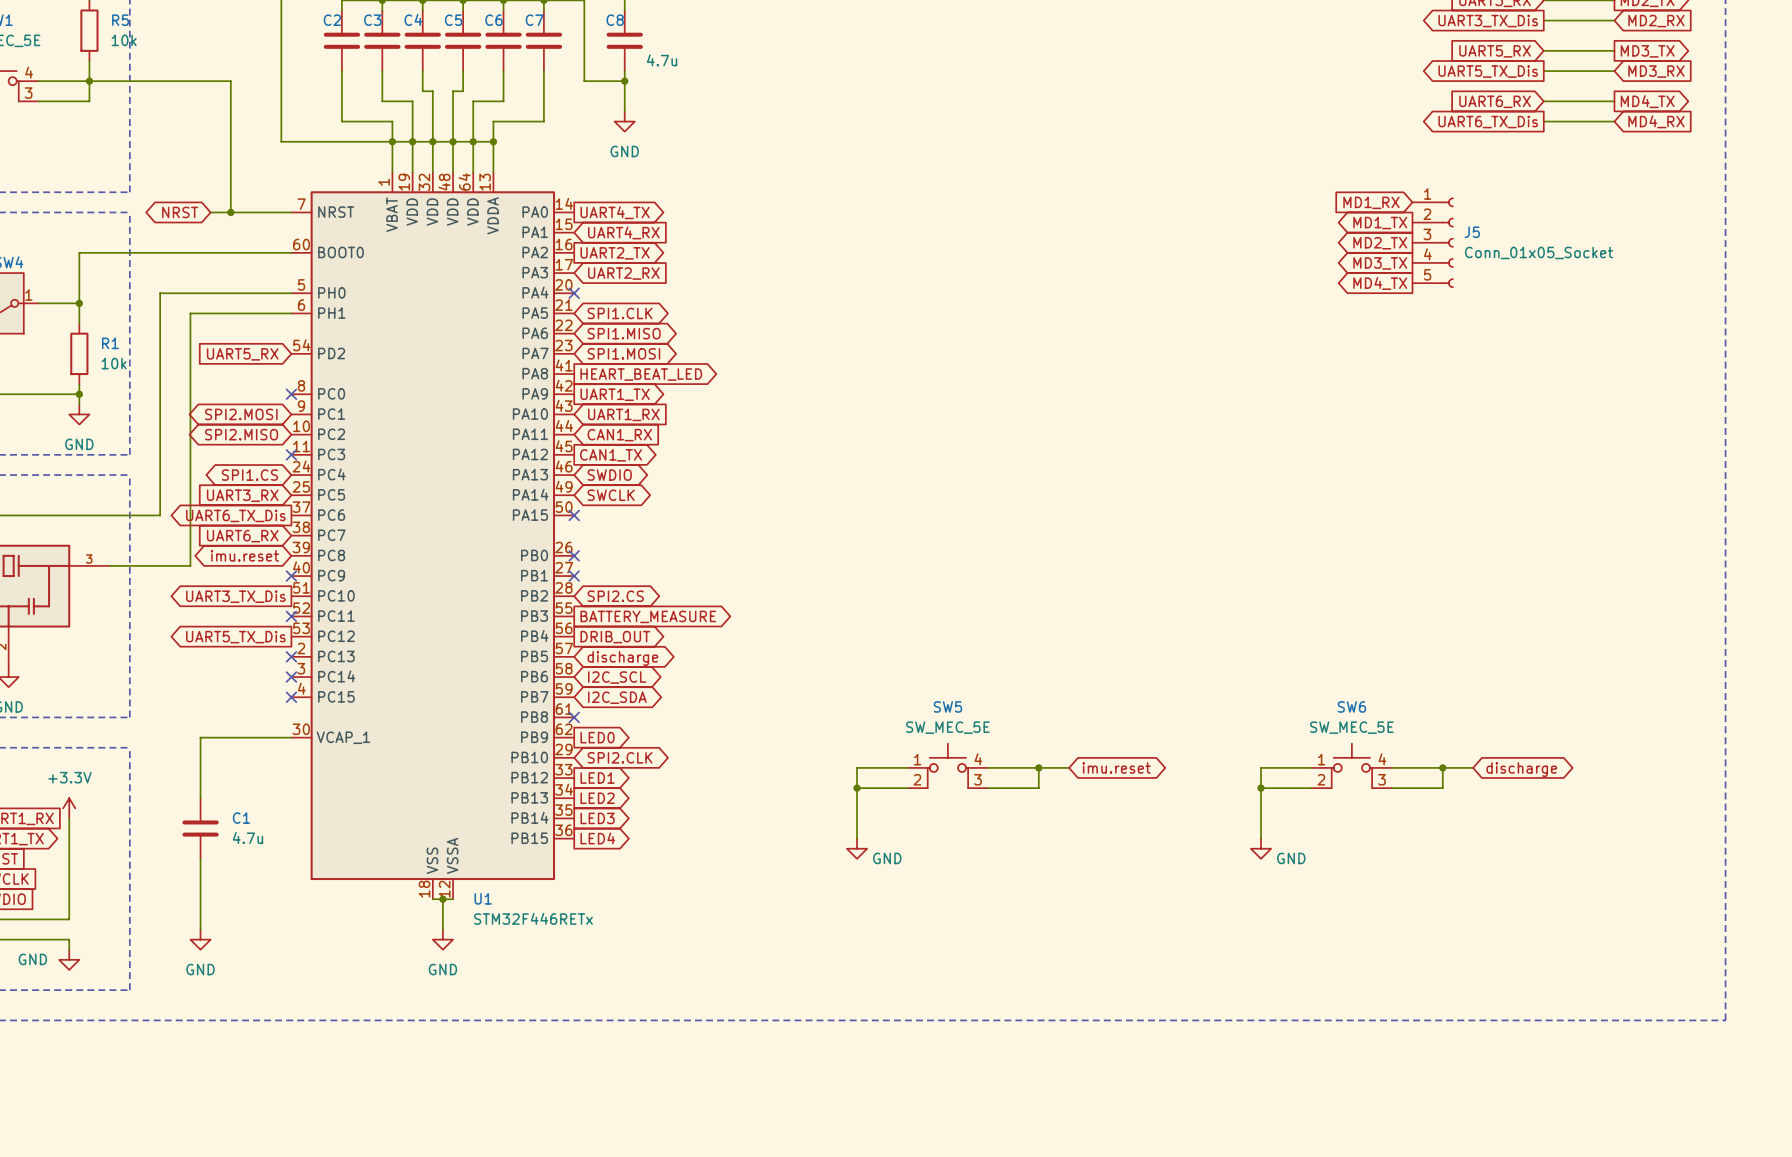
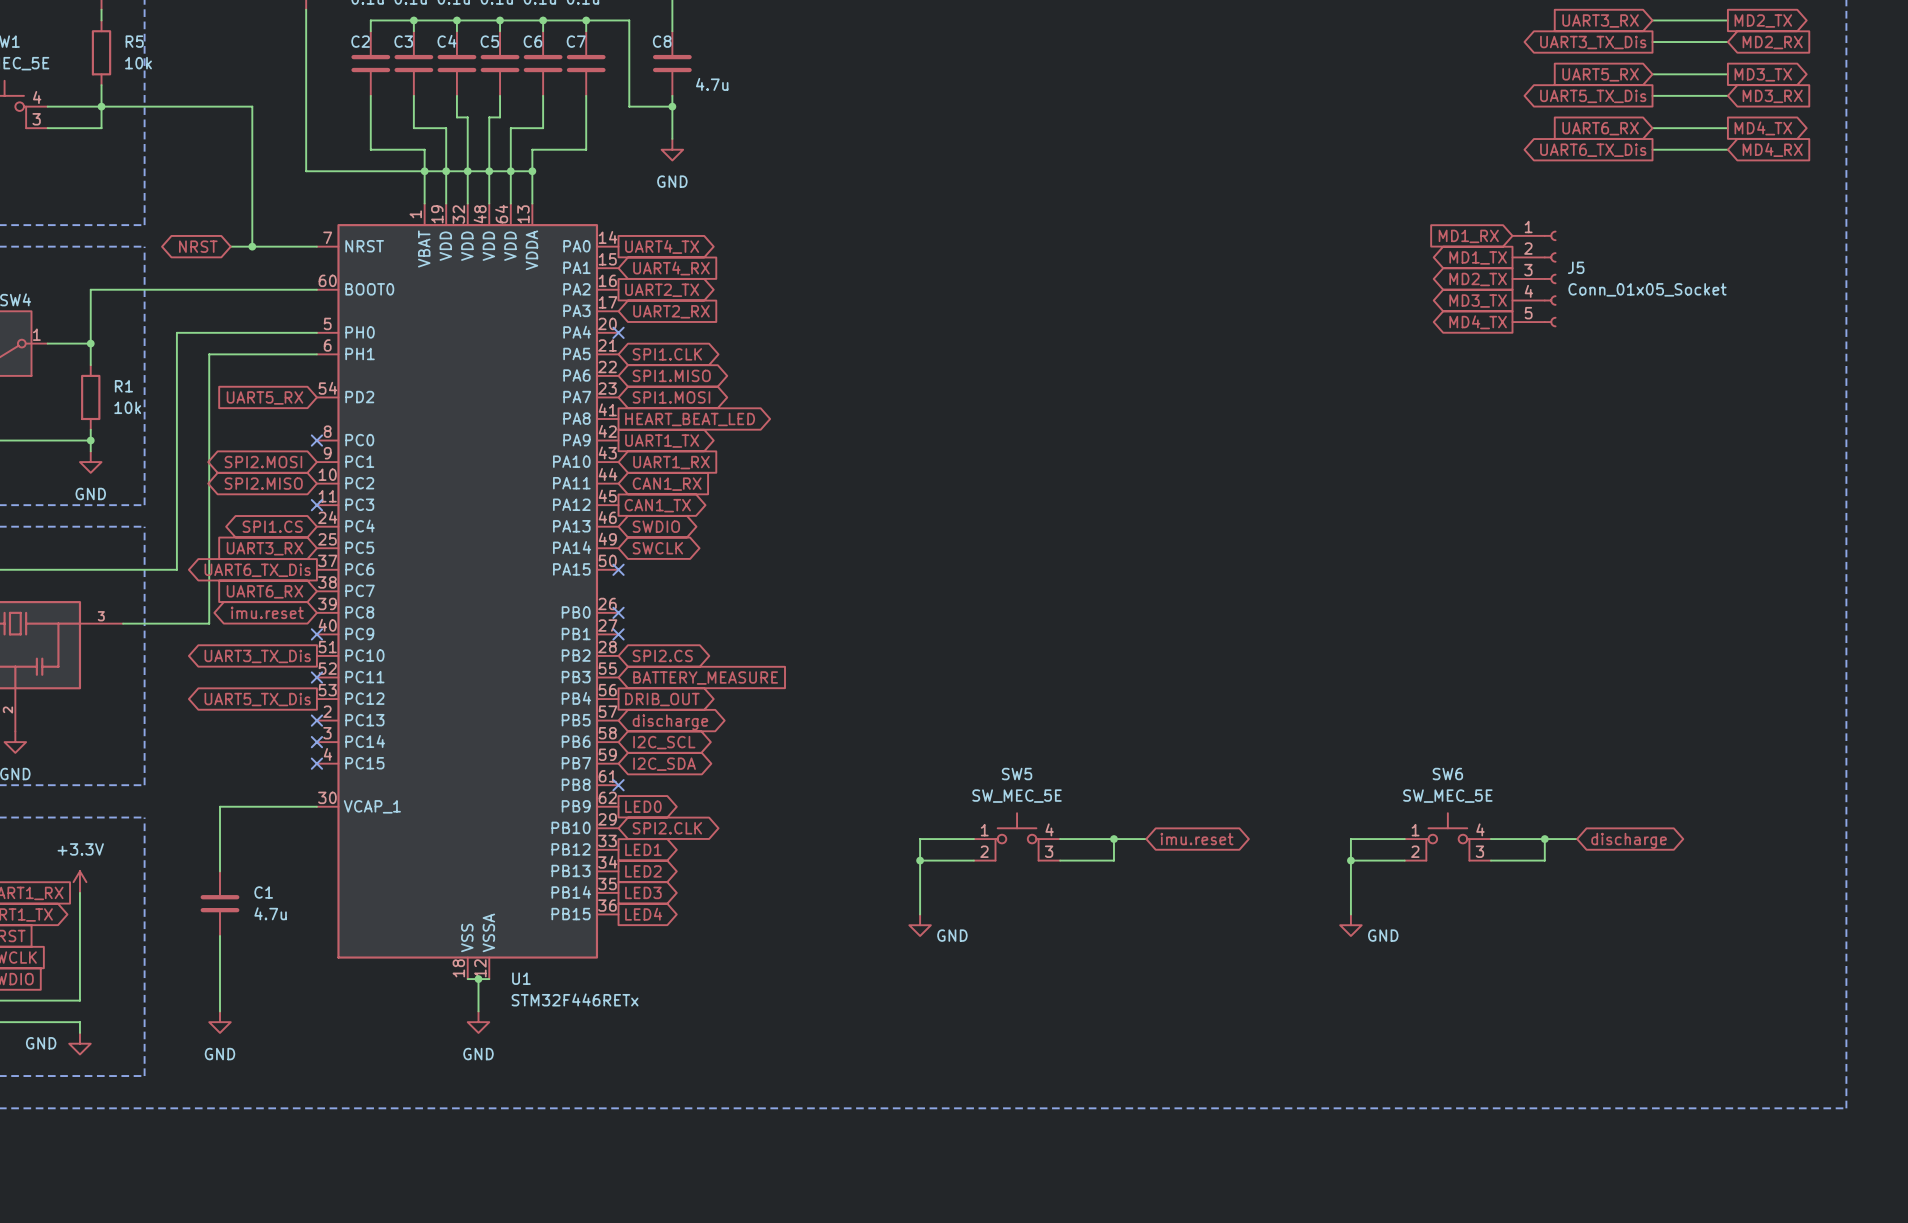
global label shape: output (648, 616) -> input (705, 678)

